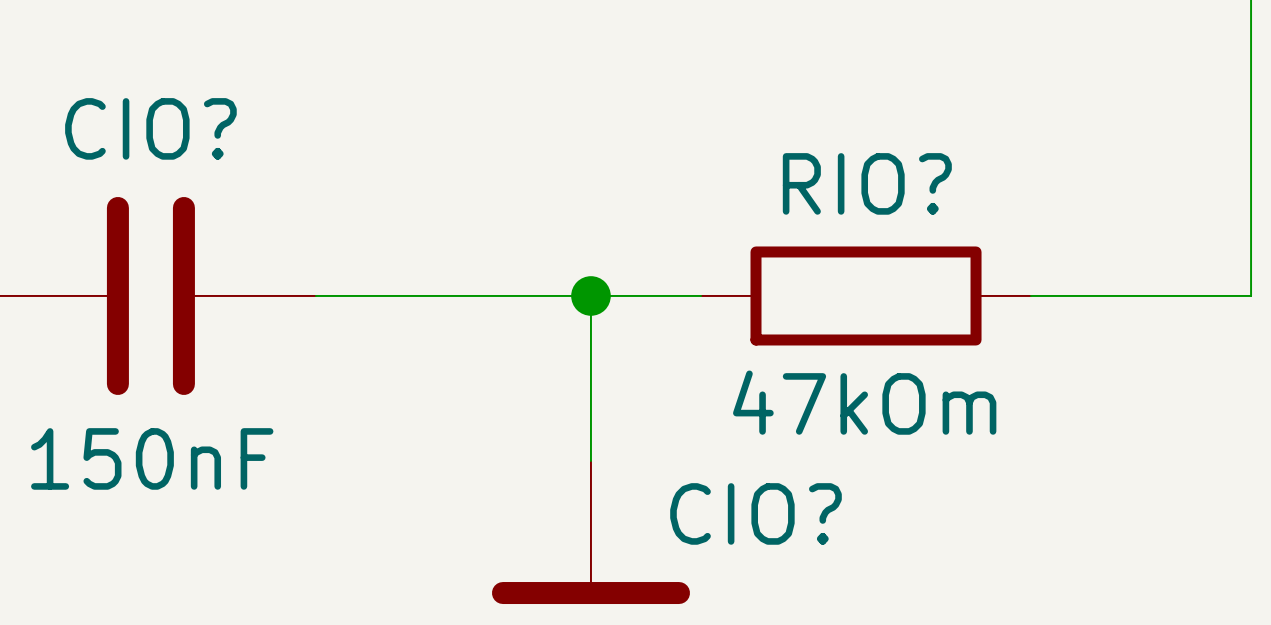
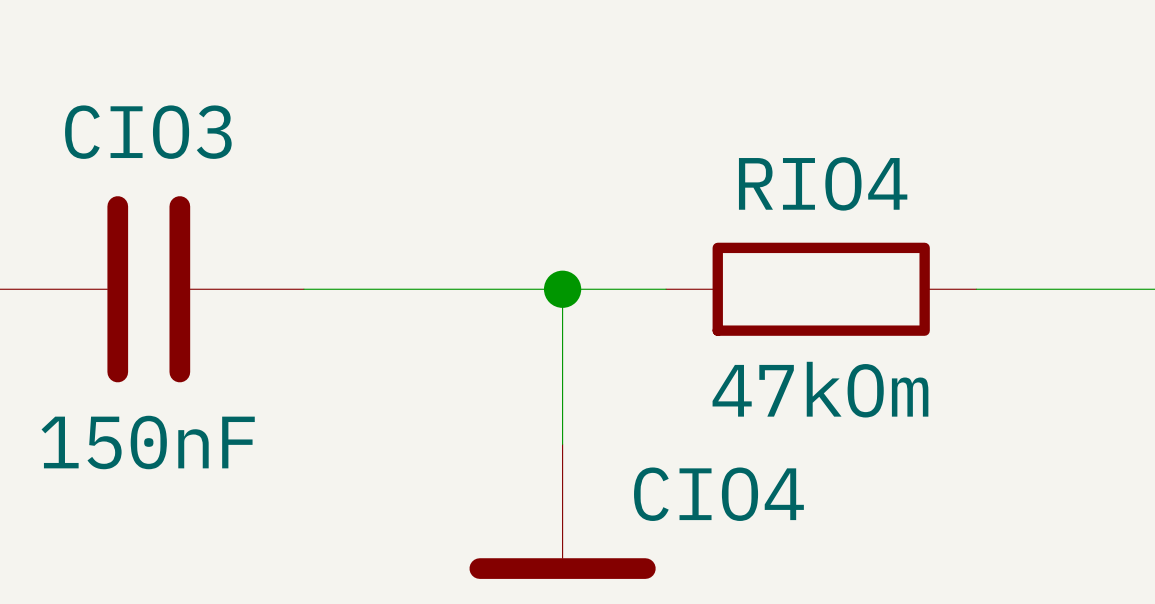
CIO? name: CIO? (150, 128) -> CIO3 (148, 132)
RIO? name: RIO? (867, 183) -> RIO4 (823, 183)
CIO? name: CIO? (756, 513) -> CIO4 (718, 494)

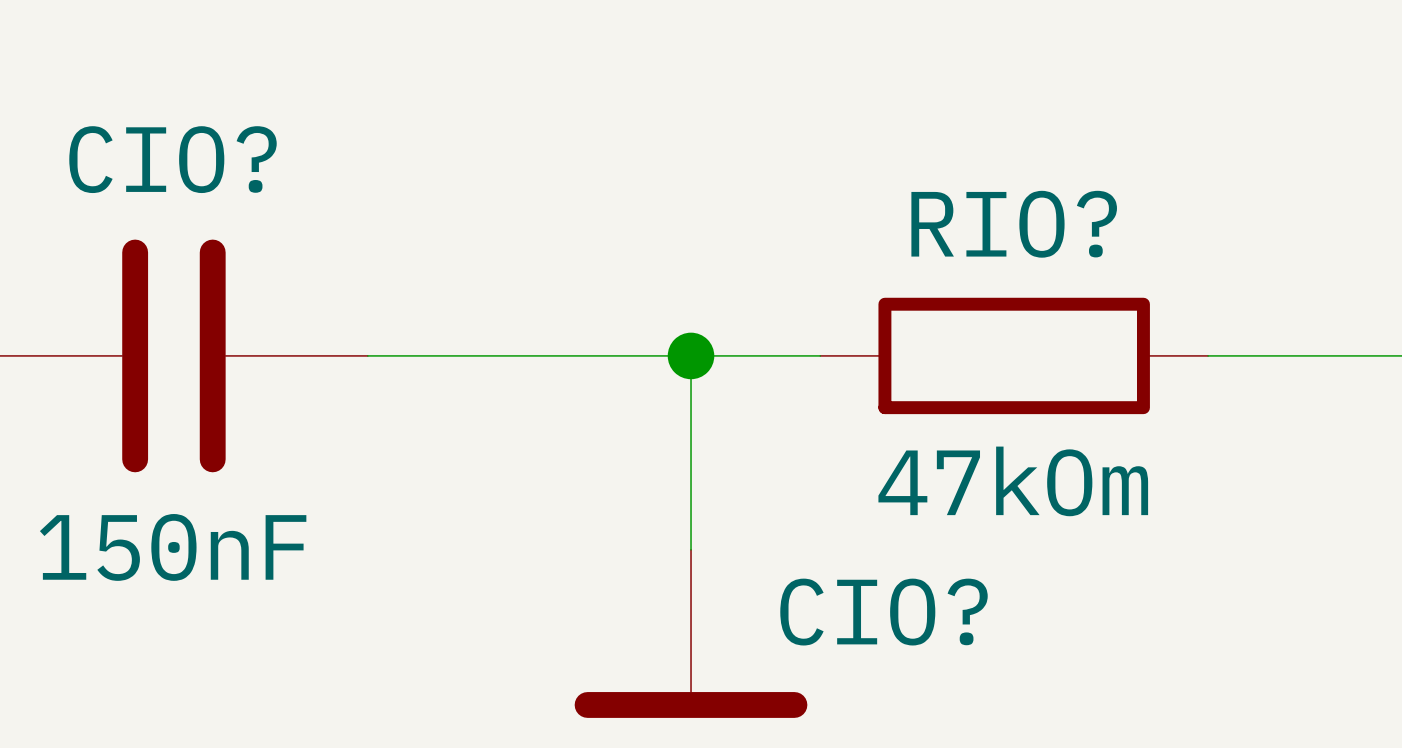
CIO3 name: CIO3 (148, 132) -> CIO? (173, 159)
RIO4 name: RIO4 (823, 183) -> RIO? (1014, 224)
CIO4 name: CIO4 (718, 494) -> CIO? (883, 612)

